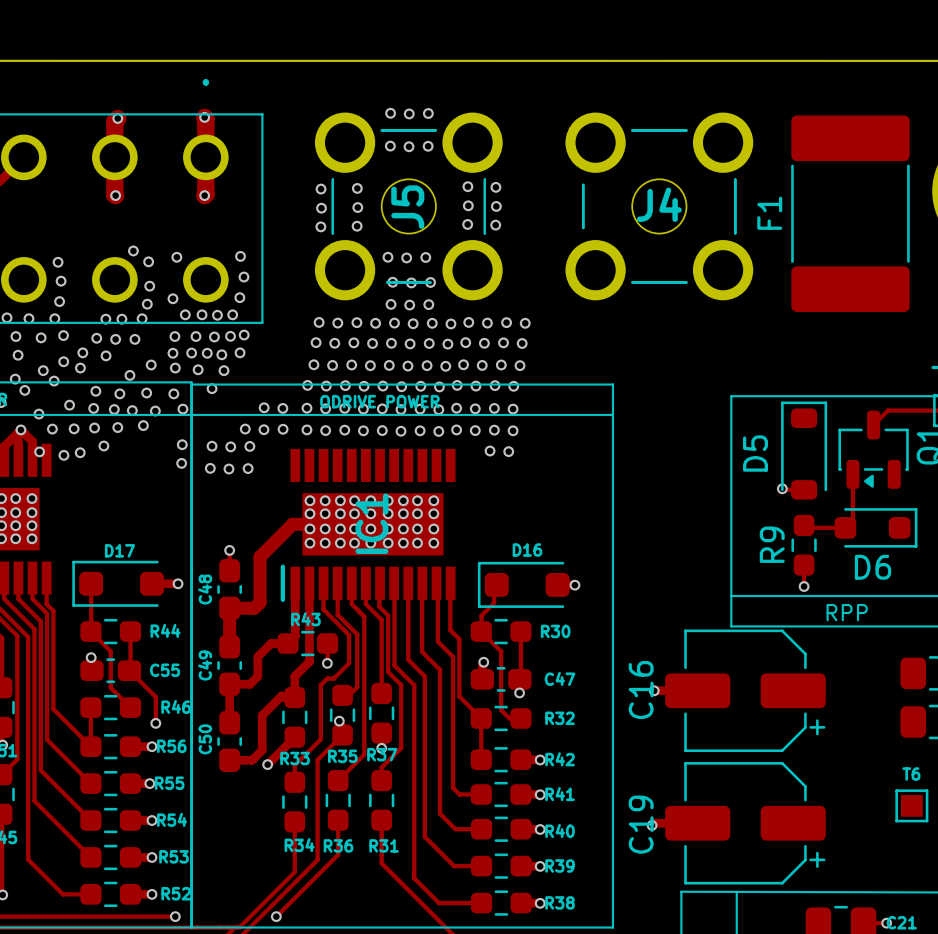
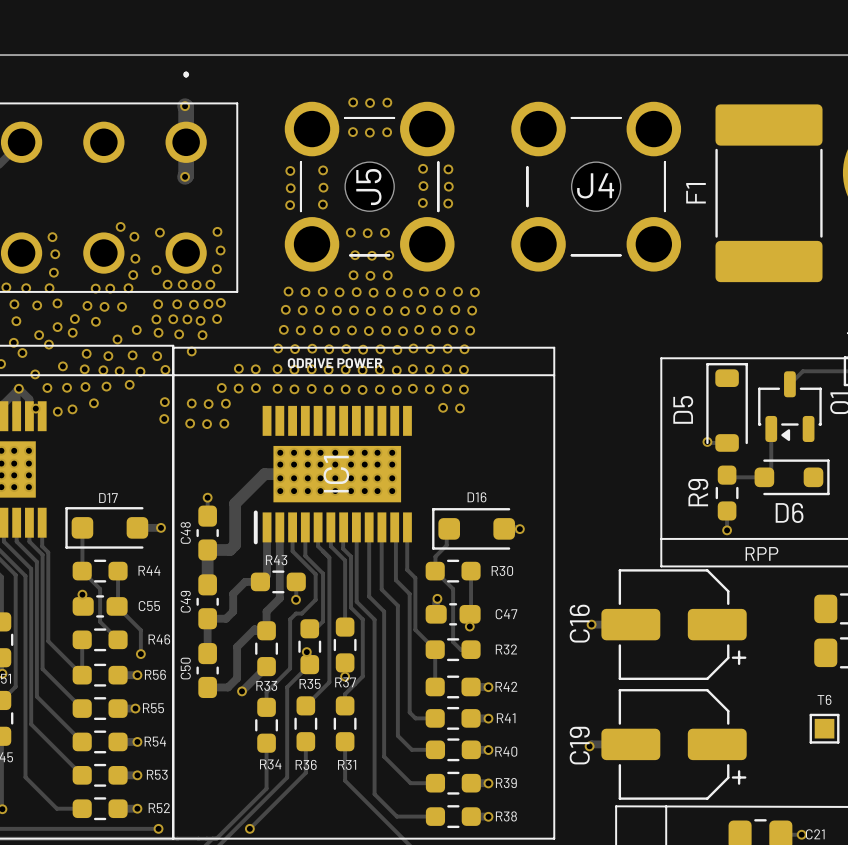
track: (117, 118) (114, 121) (115, 195) -> none
via: (117, 118) -> none
via: (115, 195) -> none

